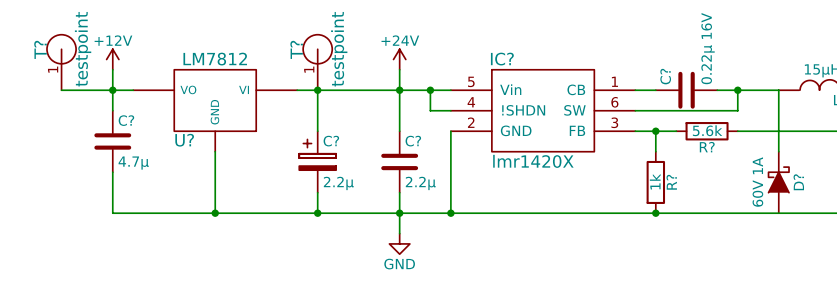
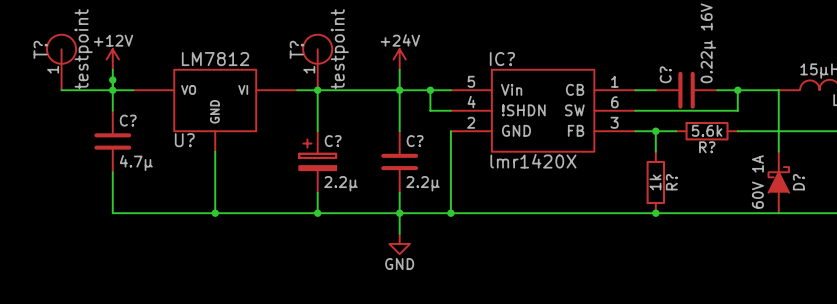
junction: none -> (112, 80)

